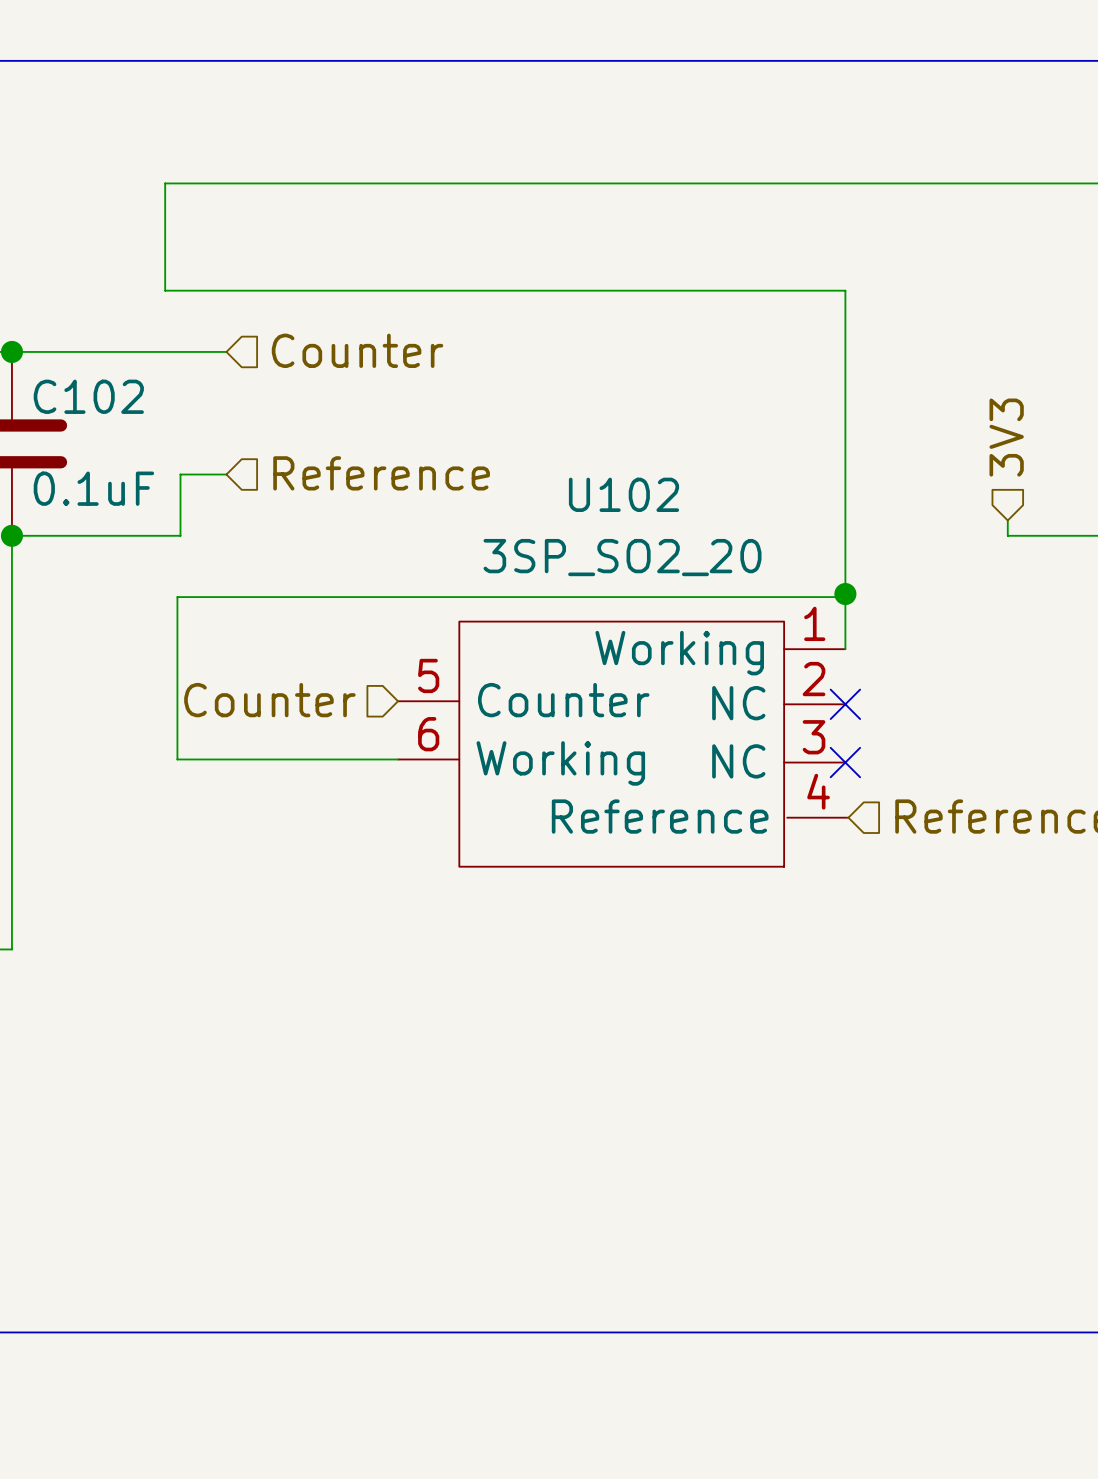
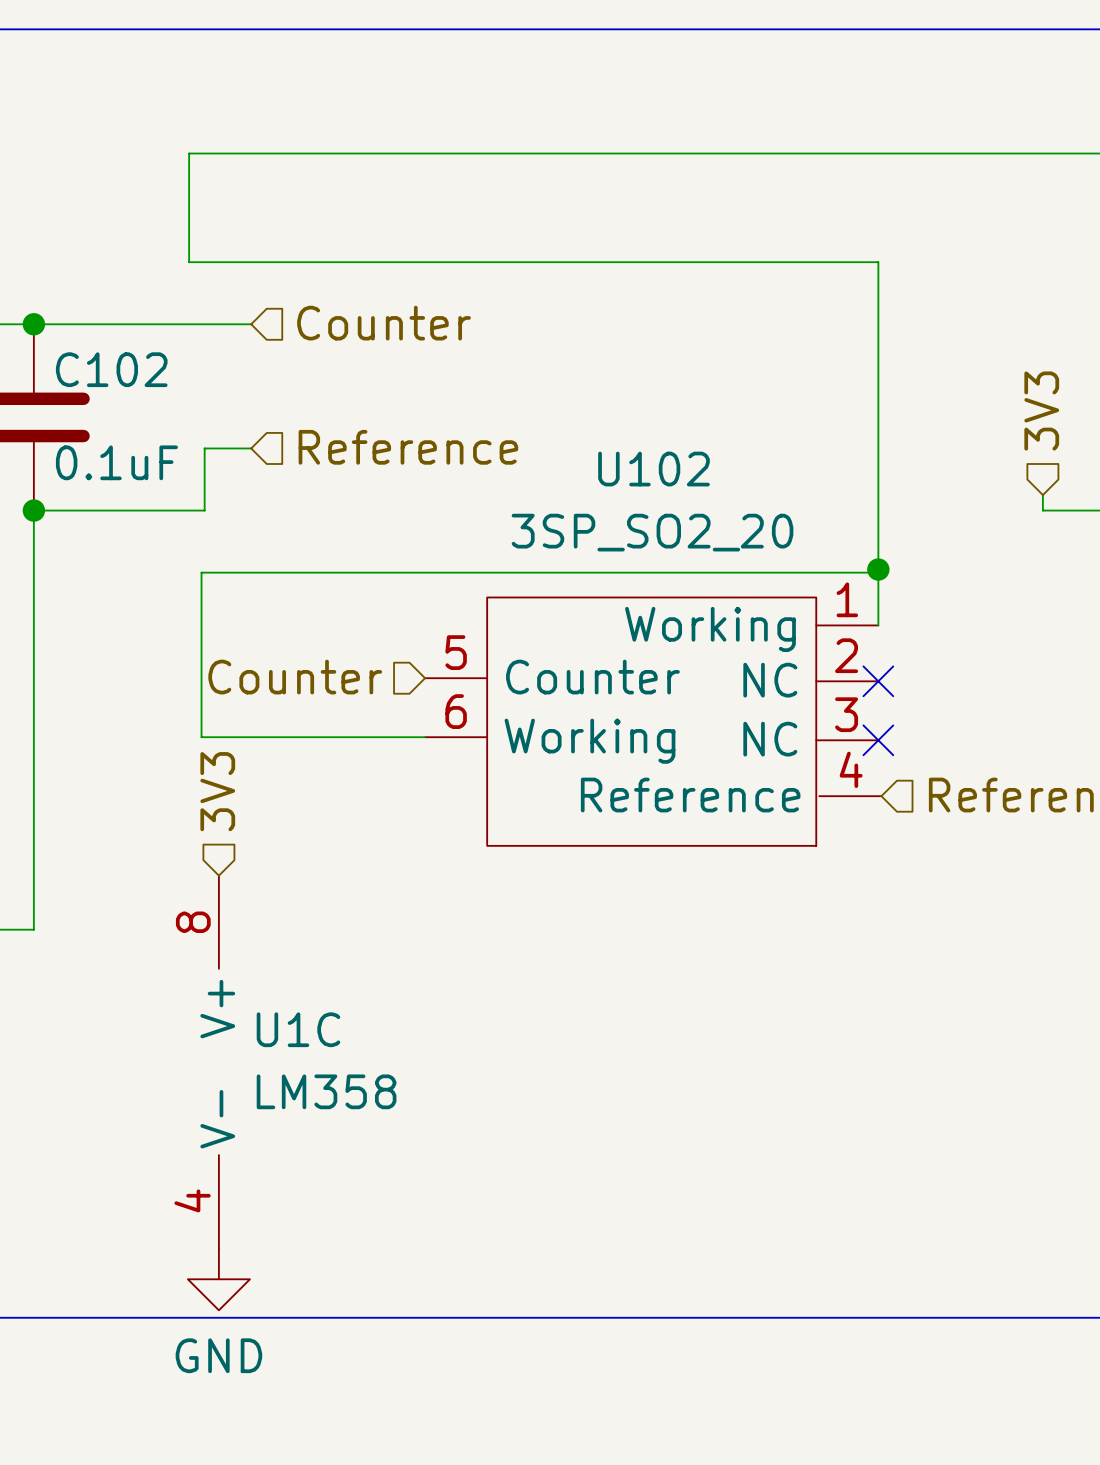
hierarchical label: none -> 3V3 (217, 791)
U1C: none -> LM358 (218, 1061)
power symbol: none -> GND (218, 1279)

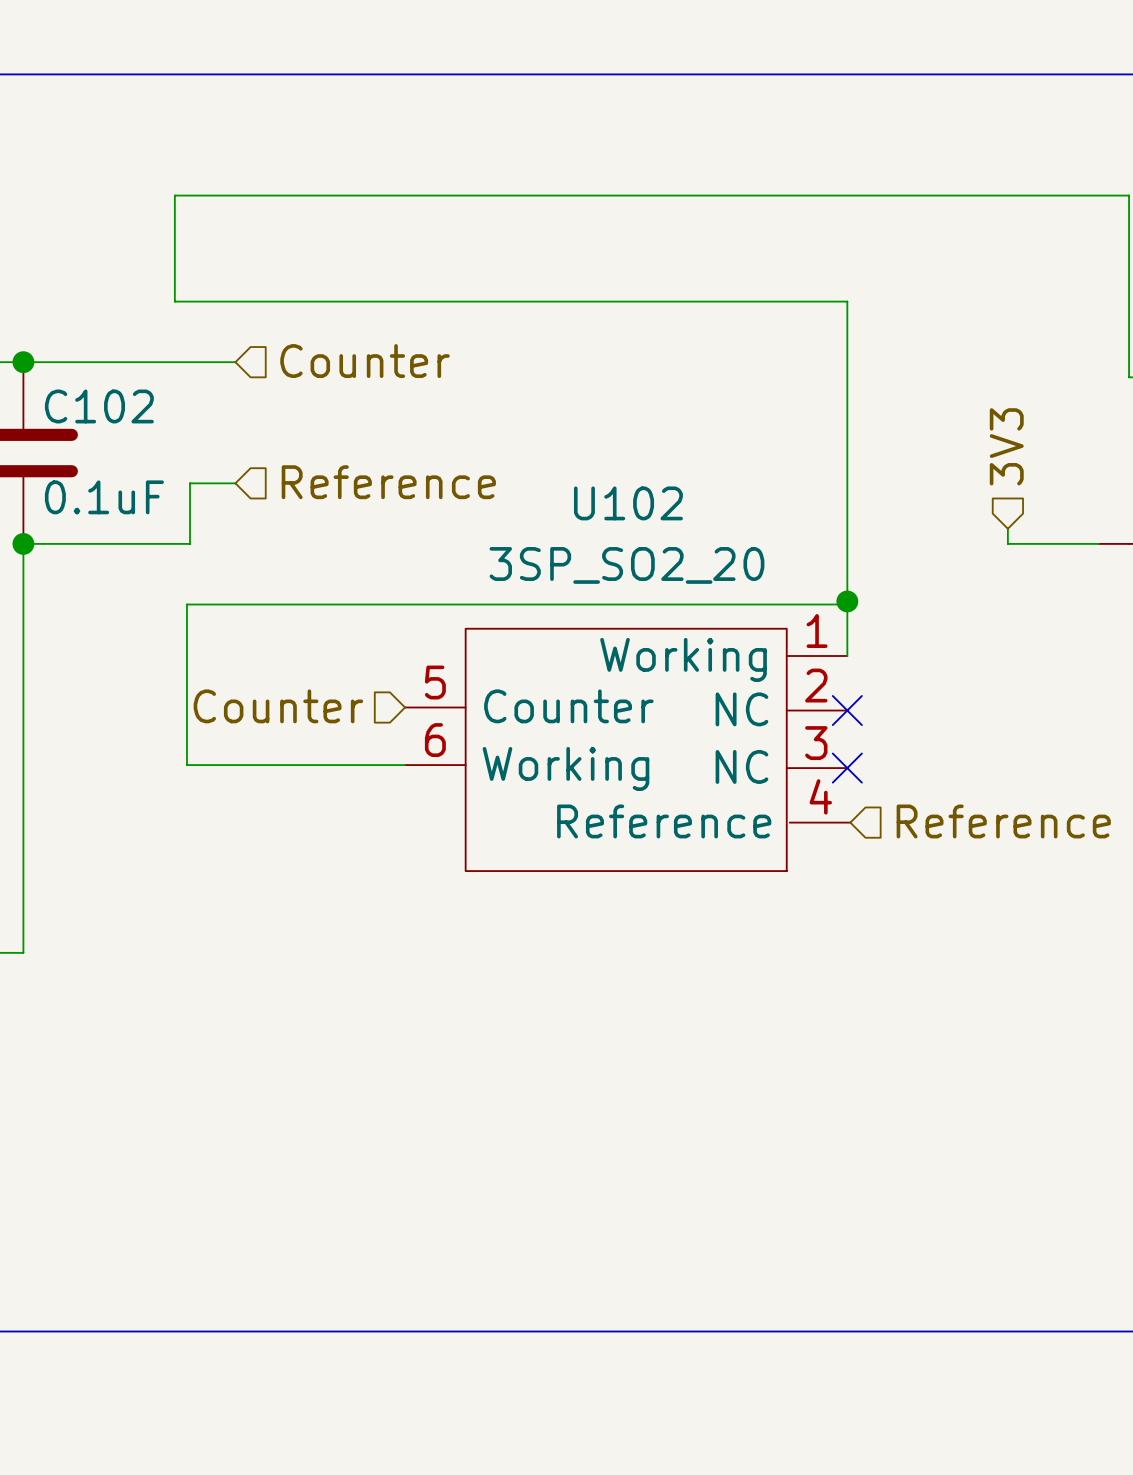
hierarchical label: 3V3 (217, 791) -> none
U1C: LM358 (218, 1061) -> none
power symbol: GND (218, 1279) -> none

